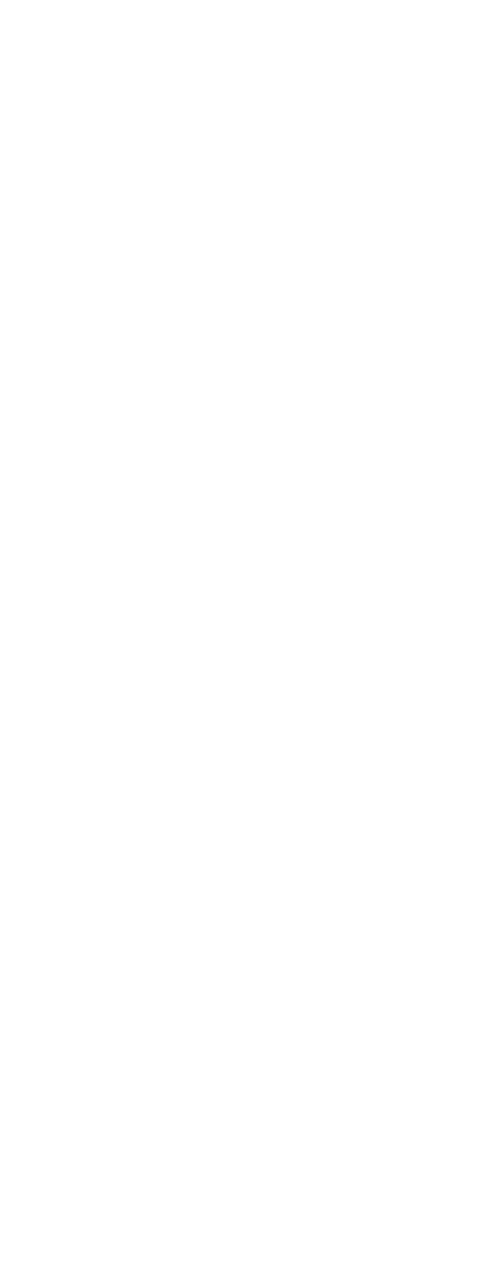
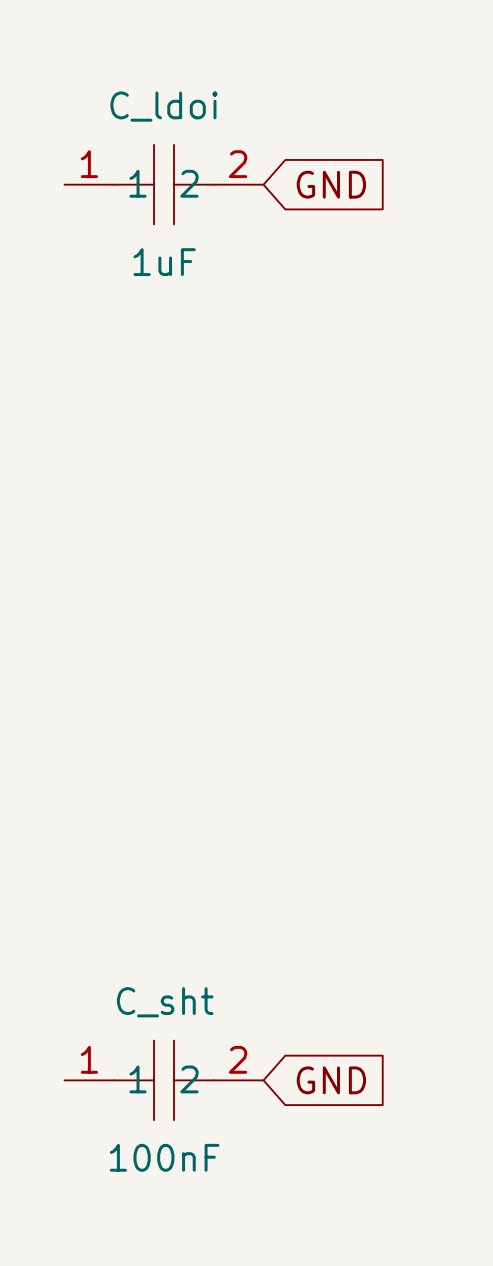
C_ldoi: none -> 1uF (164, 184)
global label: none -> GND (331, 184)
C_sht: none -> 100nF (164, 1080)
global label: none -> GND (331, 1080)

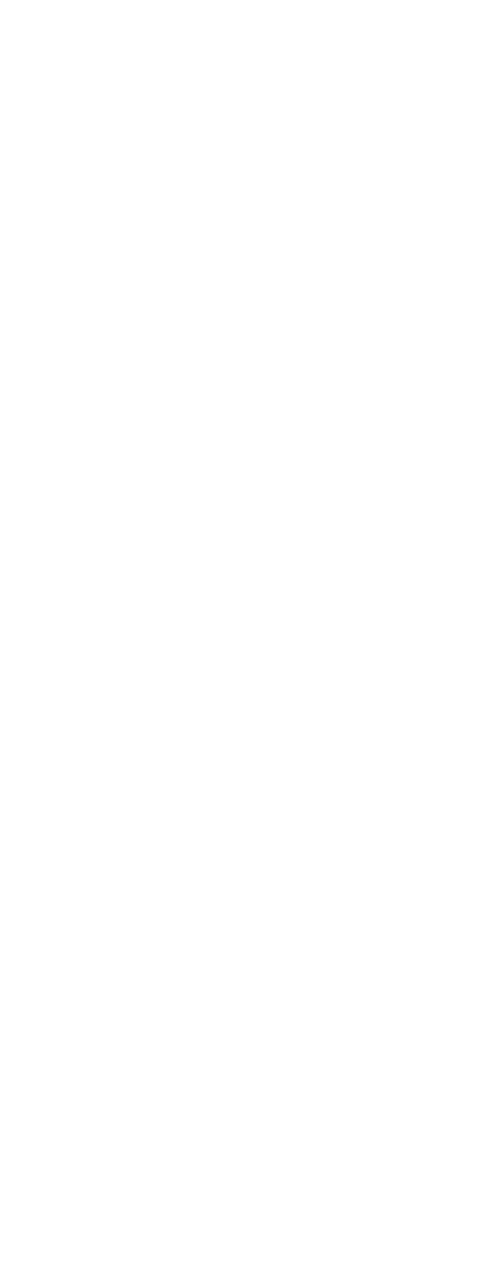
C_ldoi: 1uF (164, 184) -> none
global label: GND (331, 184) -> none
C_sht: 100nF (164, 1080) -> none
global label: GND (331, 1080) -> none

